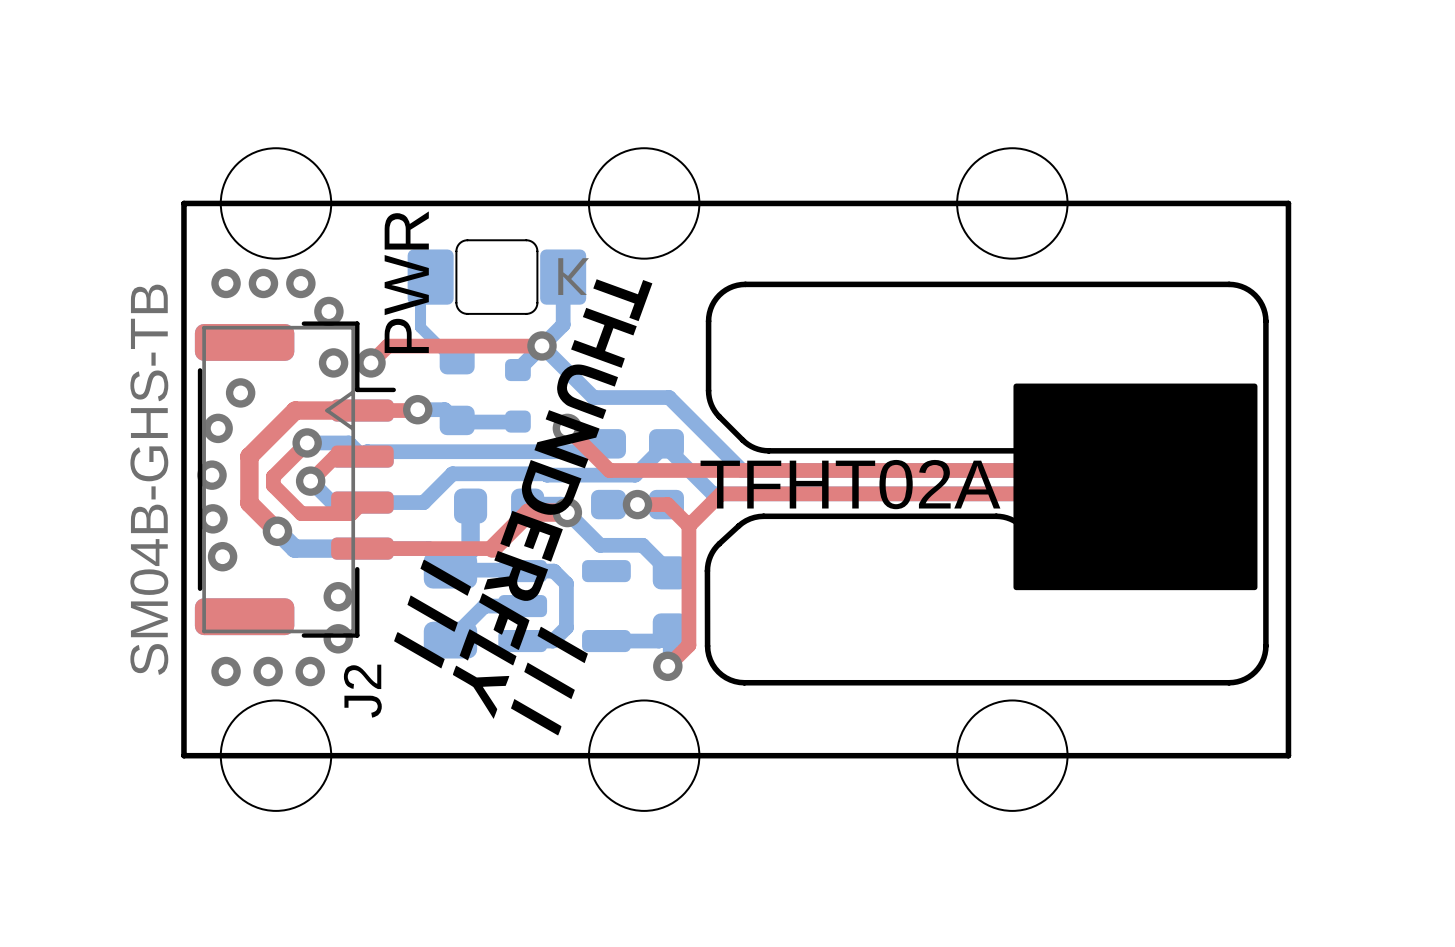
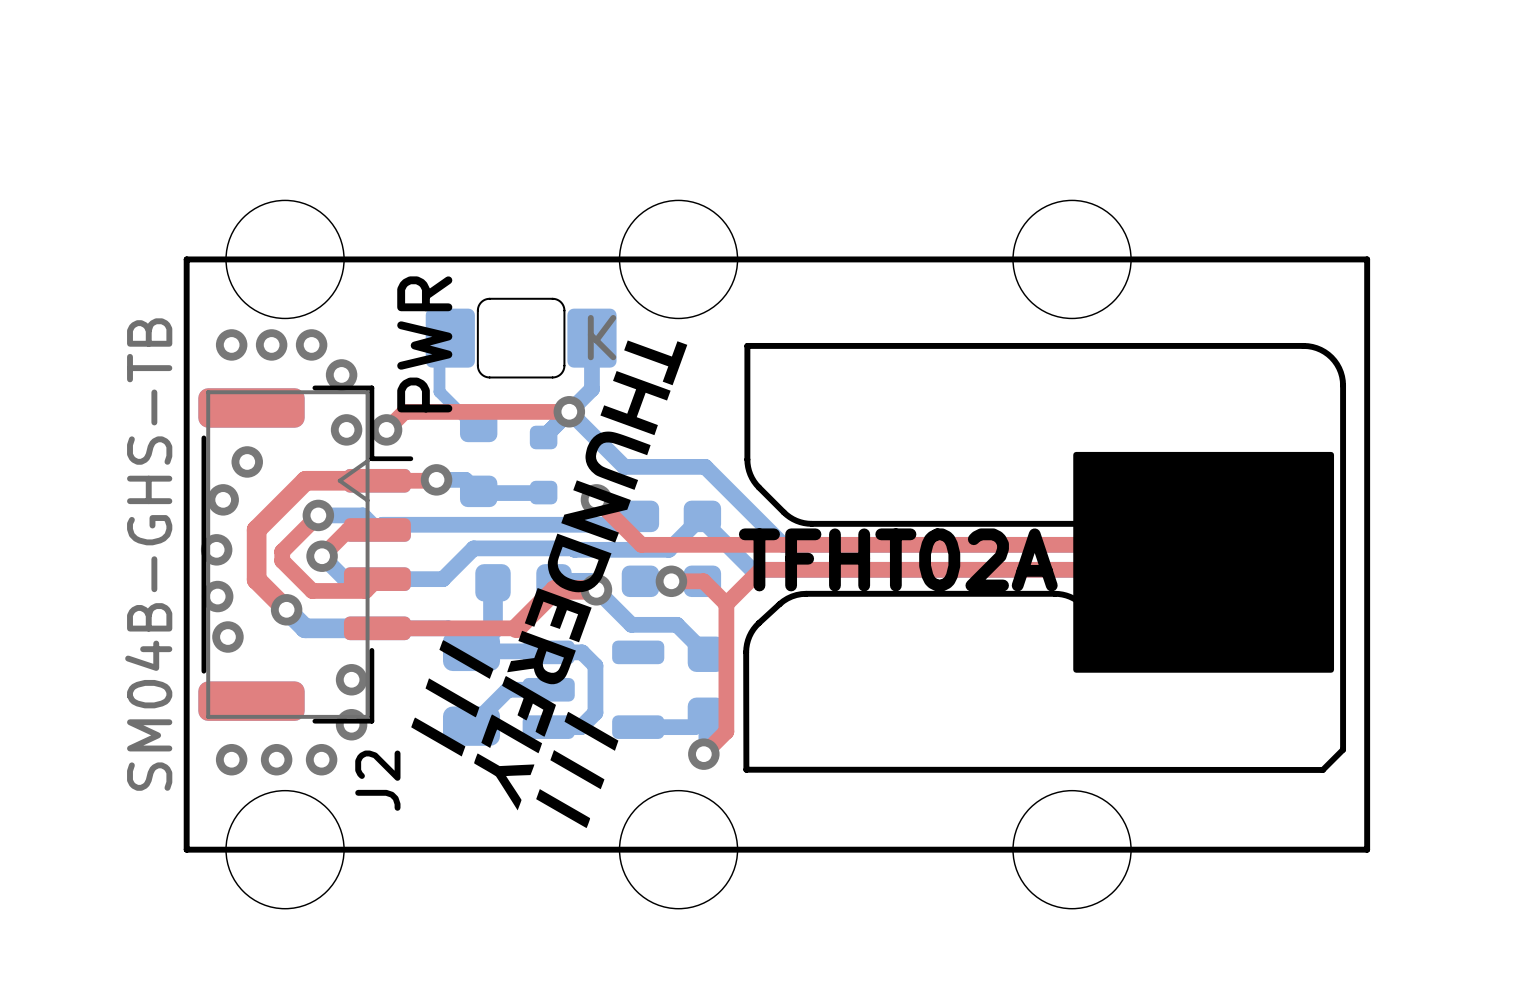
board edge: (745, 284) (729, 288) (719, 295) (712, 305) (708, 321) -> (786, 345) (747, 345) (747, 385)
board edge: (707, 646) (710, 660) (718, 671) (726, 677) (739, 682) (1229, 682) (1245, 679) (1255, 671) (1262, 661) (1265, 645) -> (746, 732) (746, 769) (1322, 769) (1343, 749) (1343, 732)

